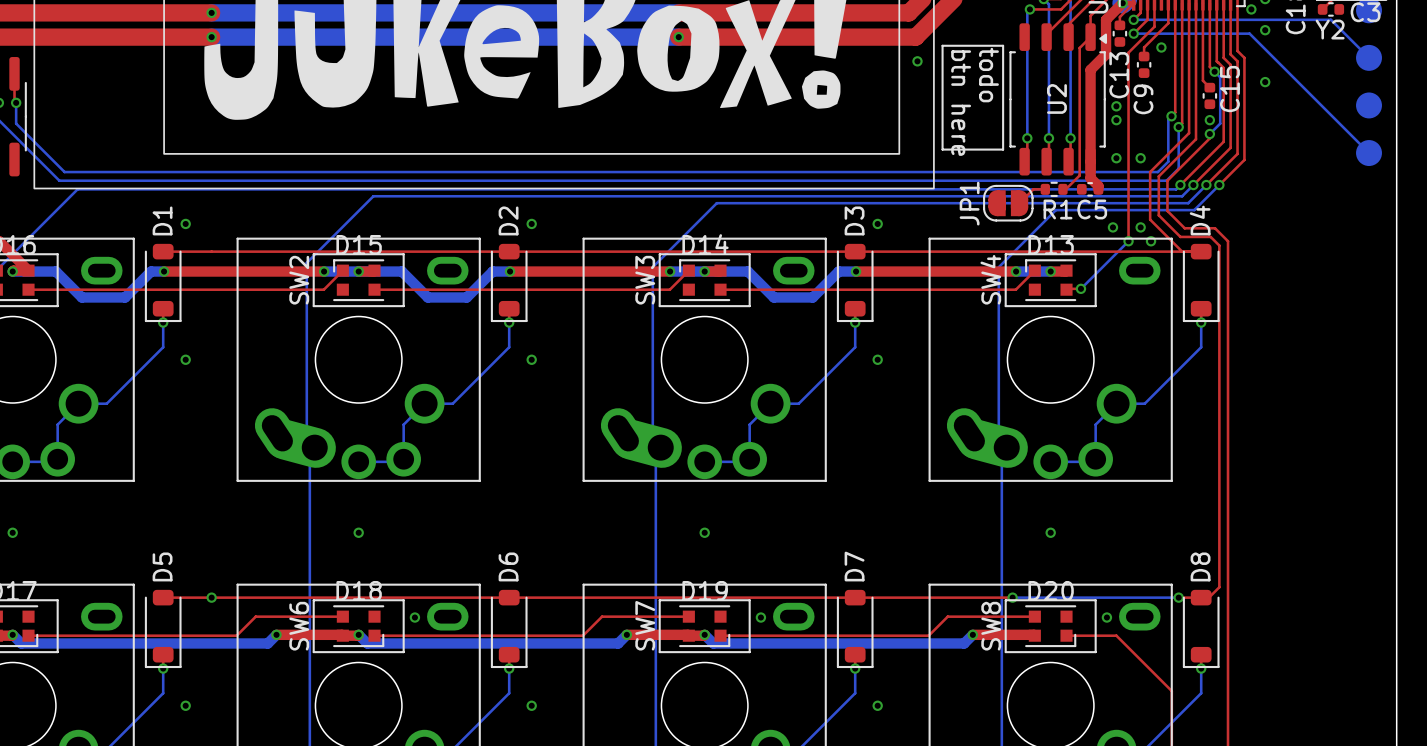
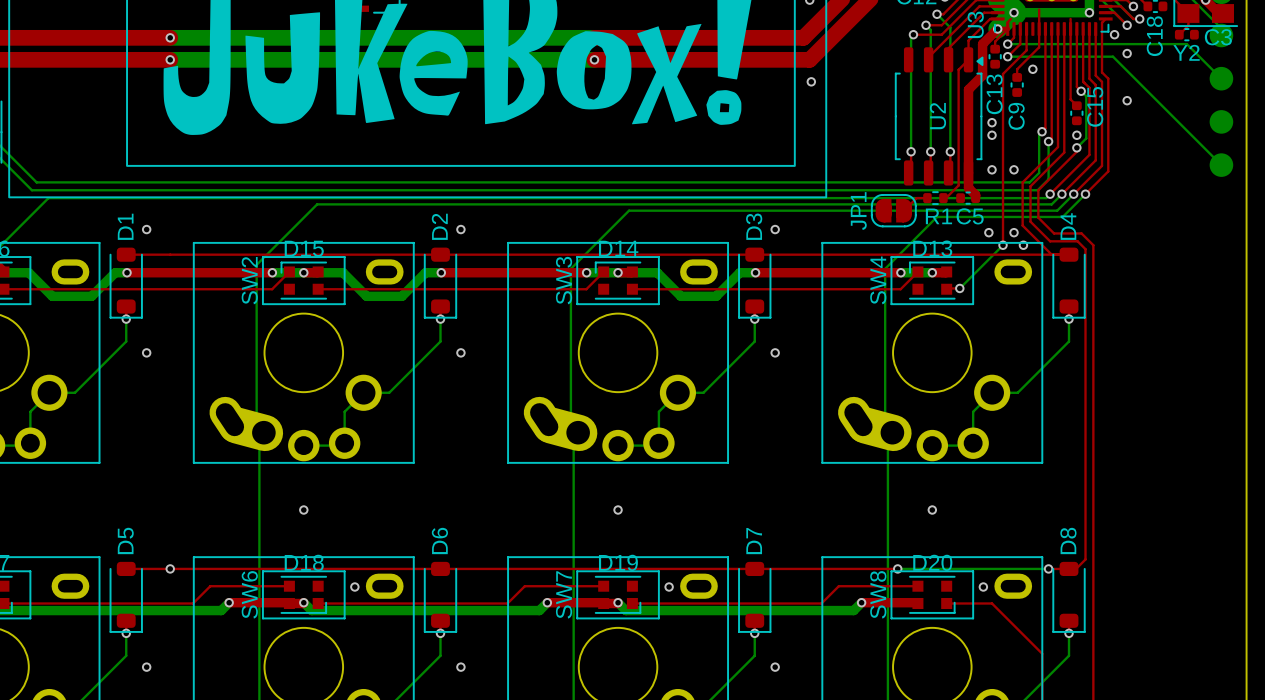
line: (942, 45) (1003, 45) (1003, 149) (942, 149) (942, 45) -> none
text: todo (988, 75) -> none
text: btn here (961, 103) -> none

